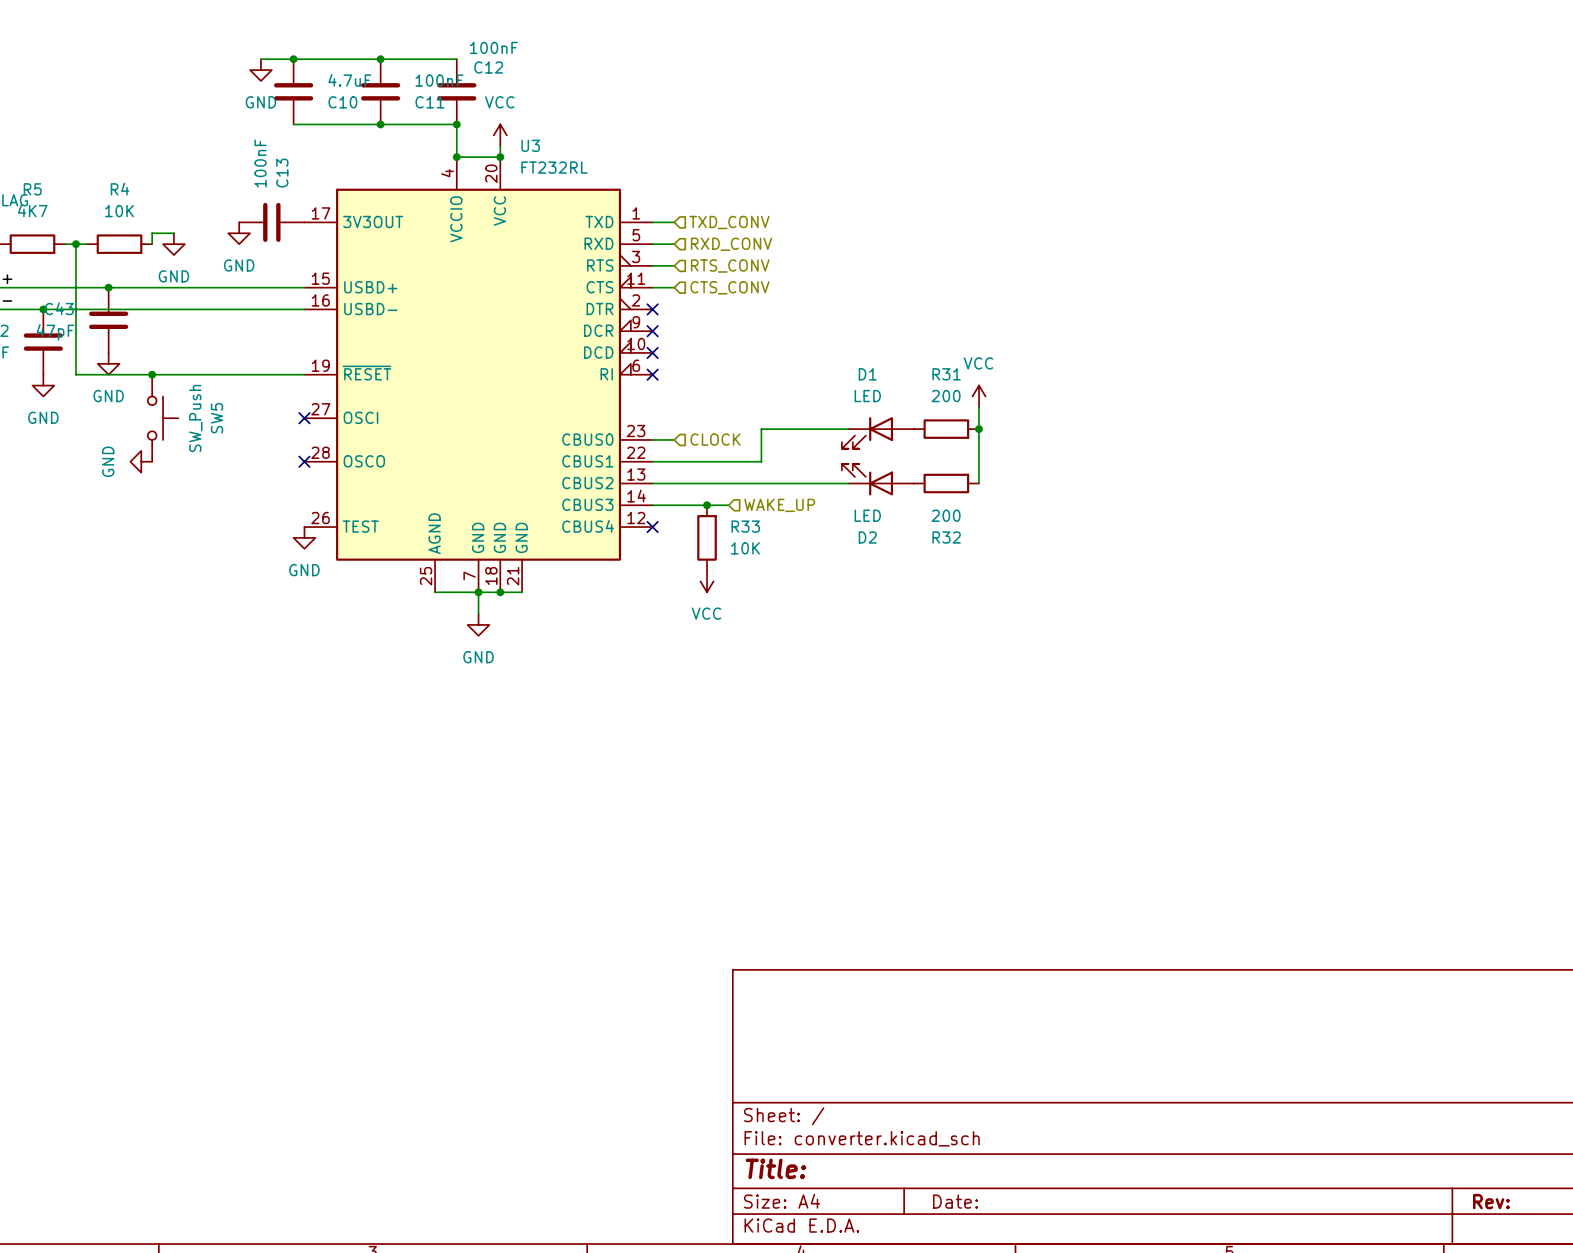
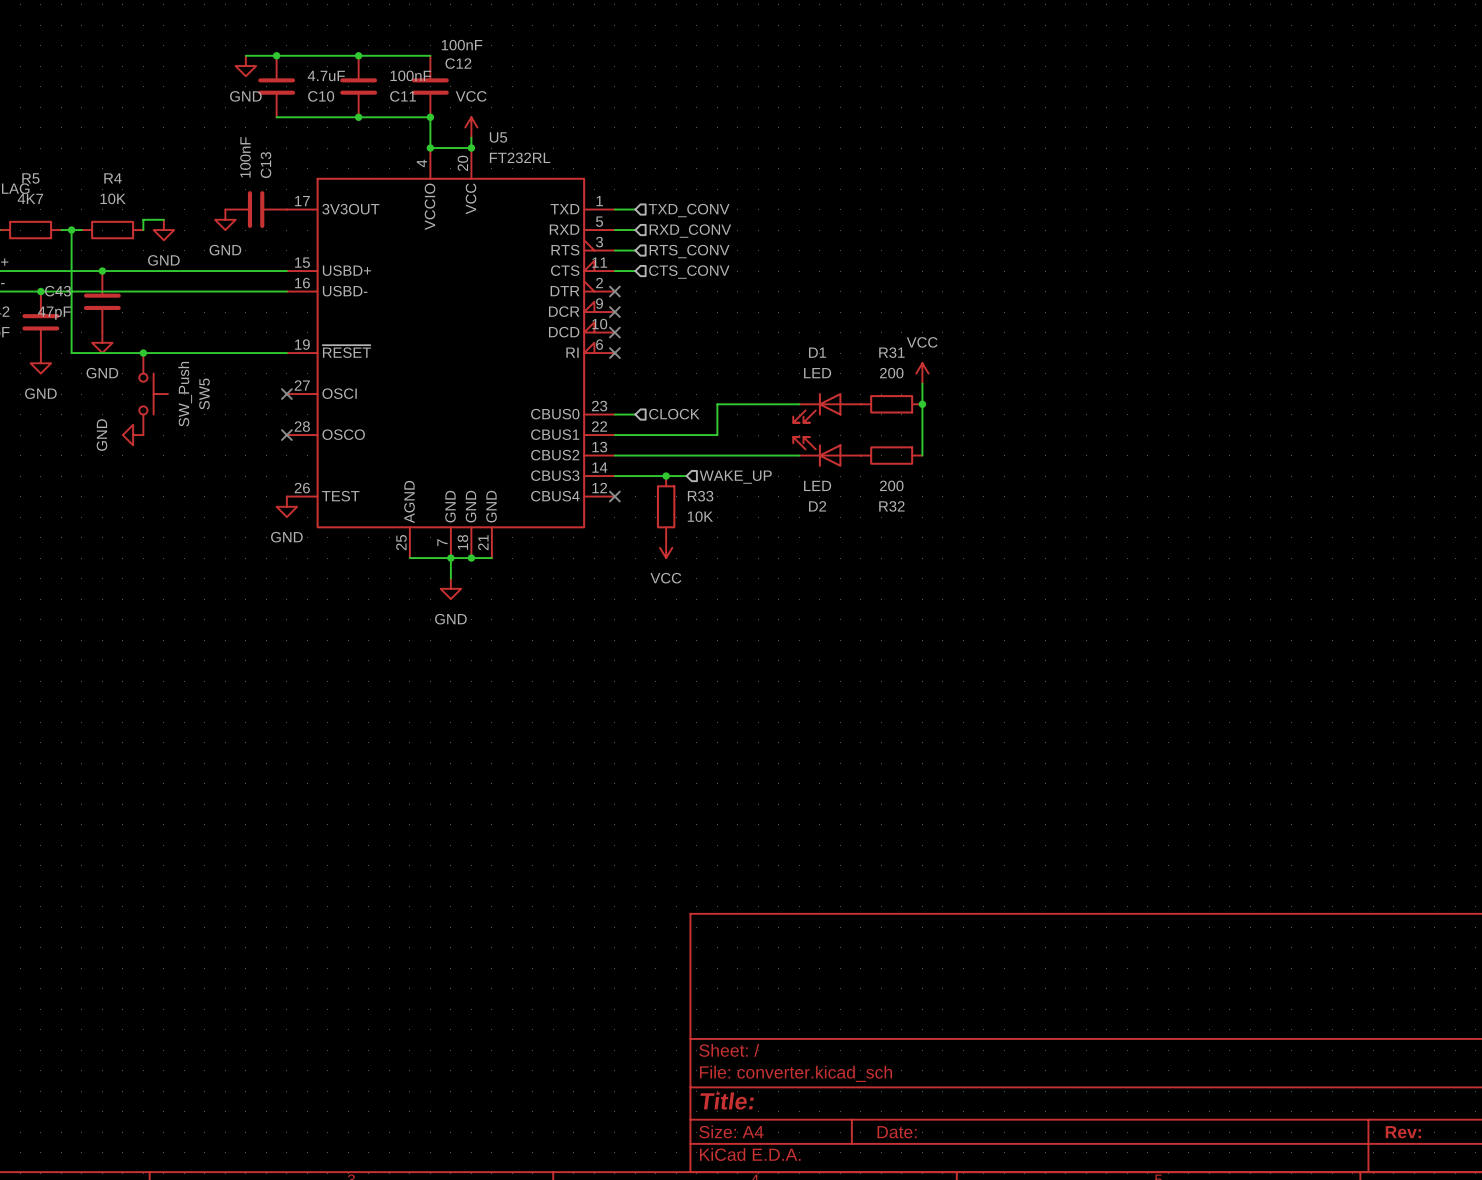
U3 name: U3 (530, 145) -> U5 (498, 137)

